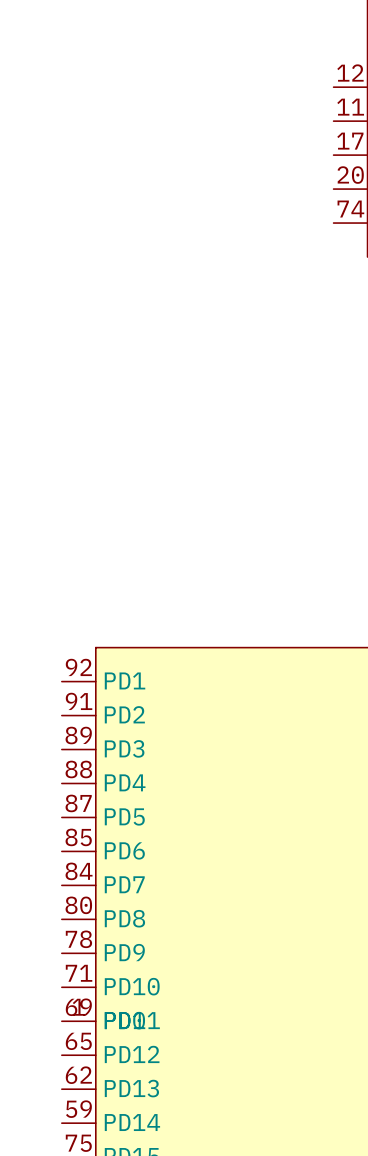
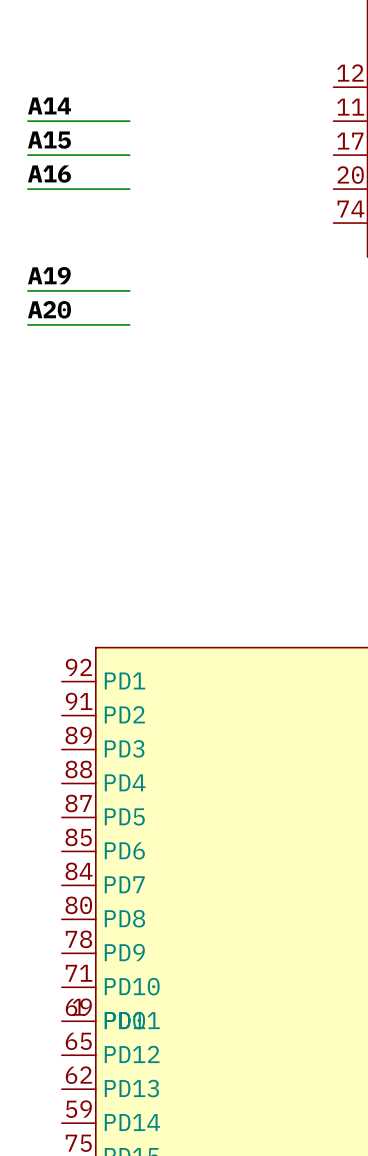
label: none -> A14 (49, 105)
wire: none -> (27, 121) (129, 121)
label: none -> A15 (49, 140)
wire: none -> (27, 155) (129, 155)
label: none -> A16 (49, 174)
wire: none -> (27, 189) (129, 189)
label: none -> A19 (49, 275)
wire: none -> (27, 290) (129, 290)
label: none -> A20 (49, 309)
wire: none -> (27, 324) (129, 324)

